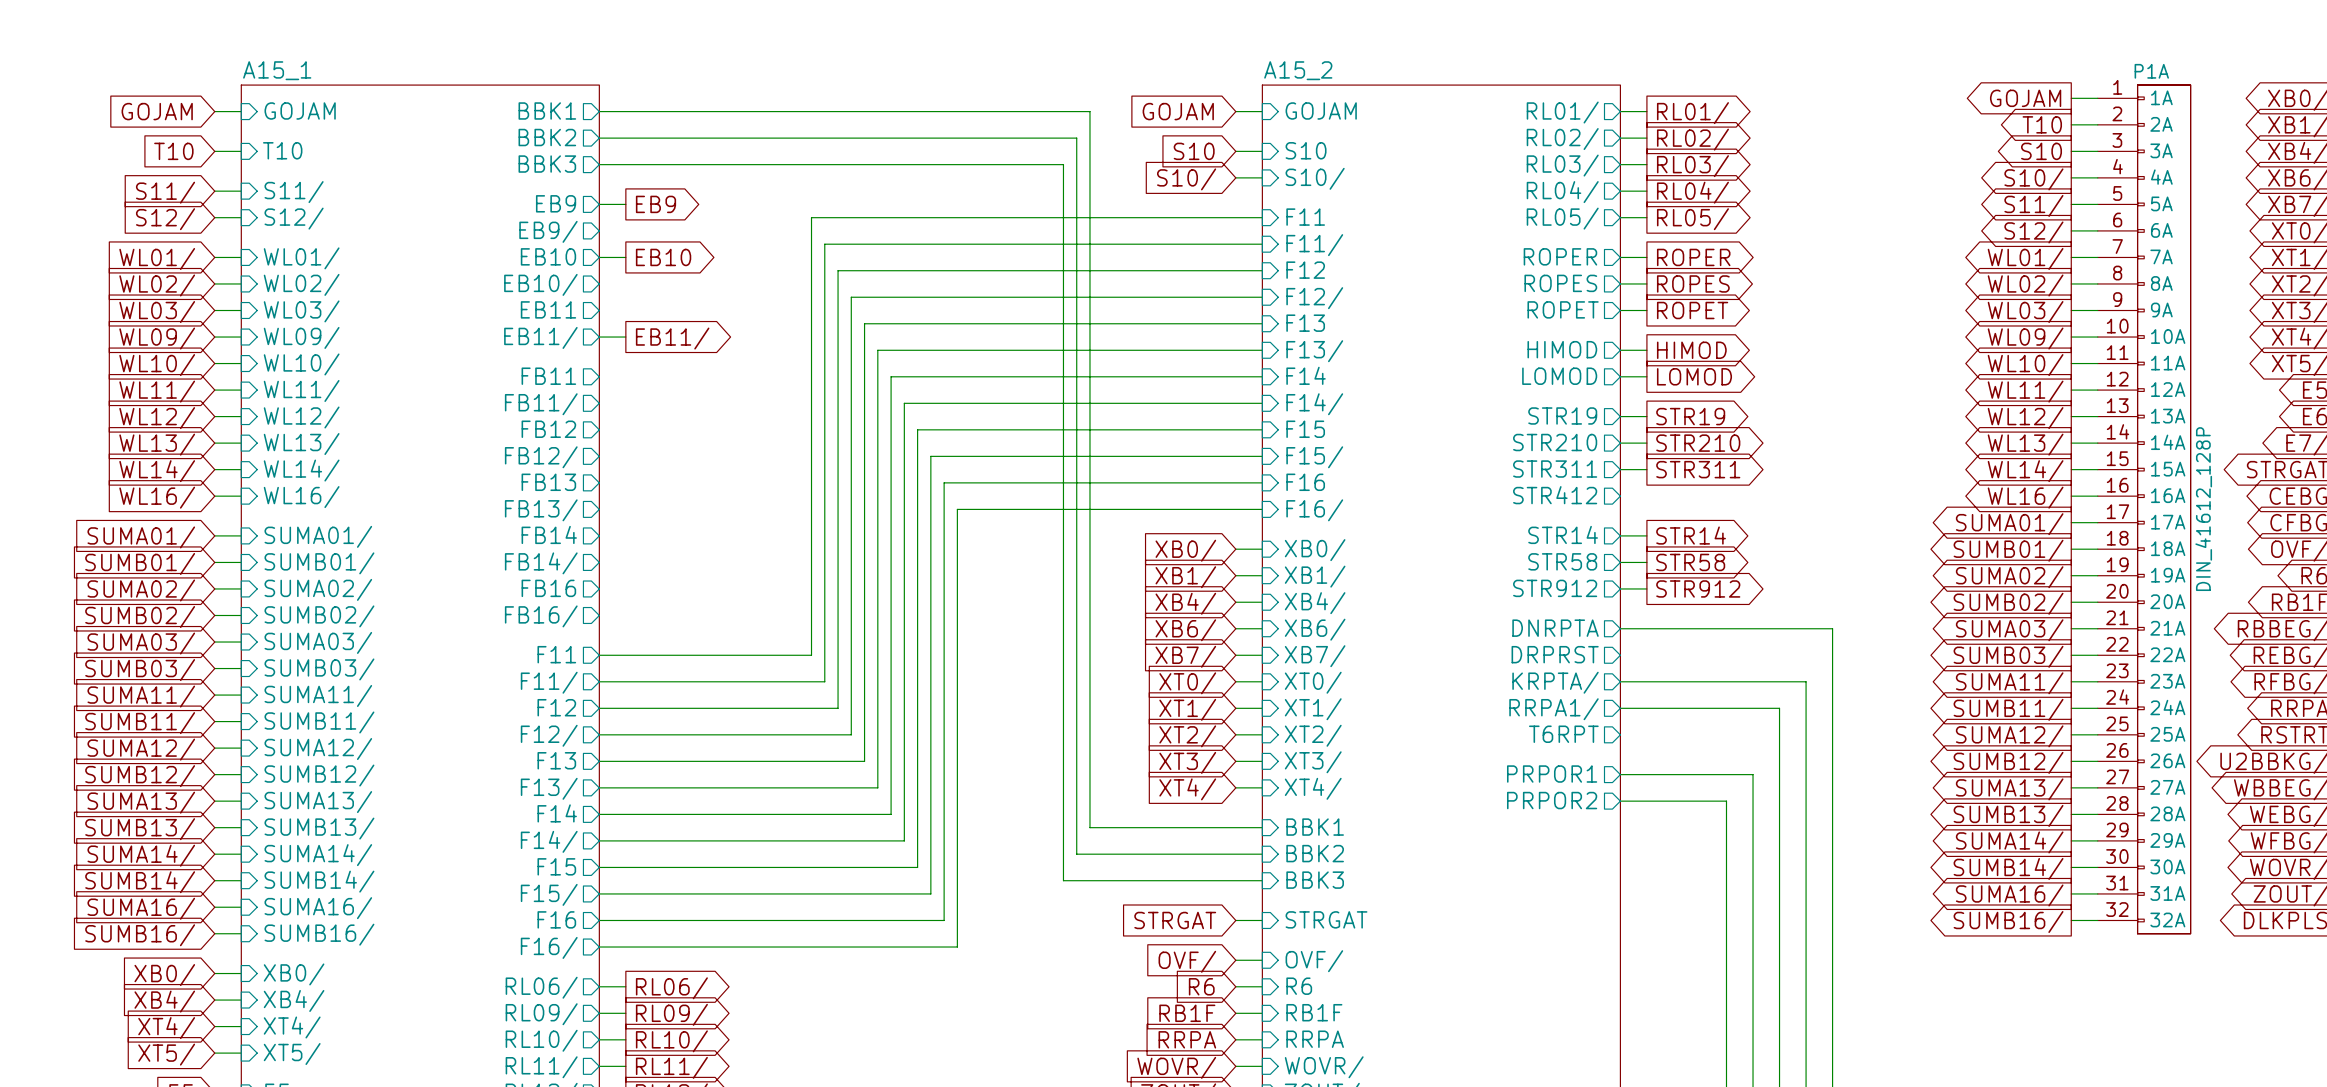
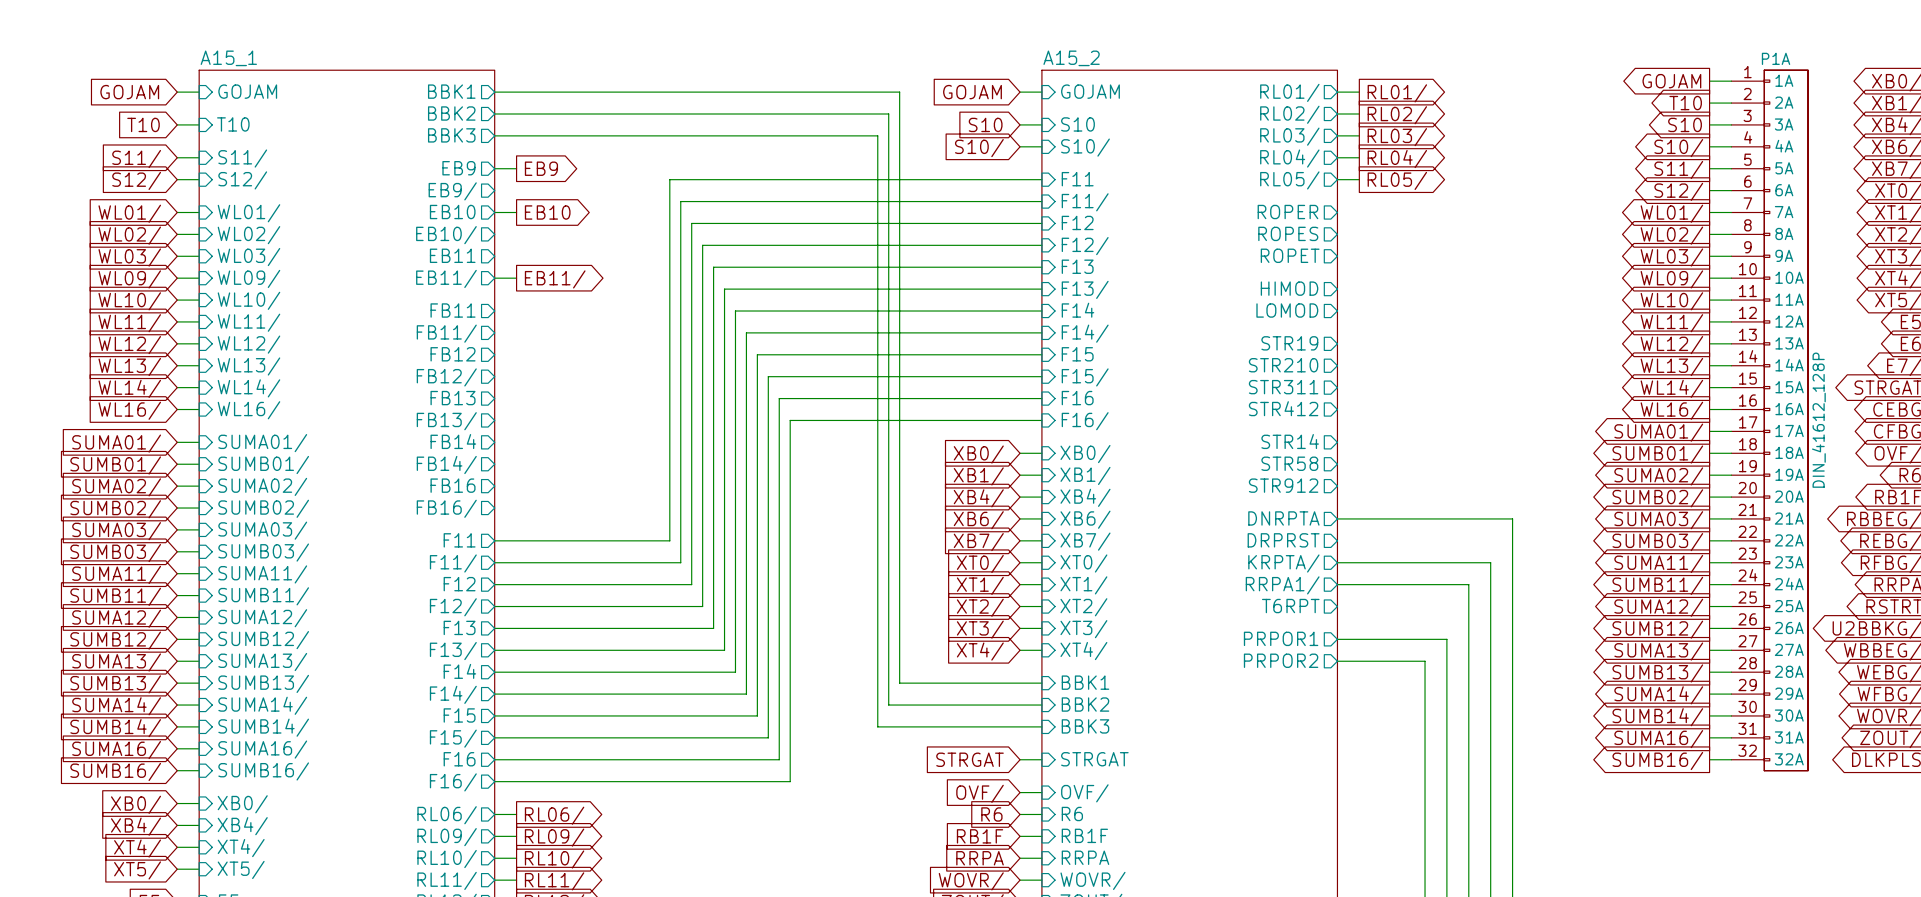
wire: (1620, 257) (1646, 257) -> none
global label: ROPER (1693, 257) -> none
wire: (1620, 283) (1646, 283) -> none
global label: ROPES (1693, 283) -> none
wire: (1620, 310) (1646, 310) -> none
global label: ROPET (1692, 310) -> none
wire: (1620, 350) (1646, 350) -> none
global label: HIMOD (1691, 350) -> none
wire: (1620, 376) (1646, 376) -> none
global label: LOMOD (1694, 376) -> none
wire: (1620, 416) (1646, 416) -> none
global label: STR19 (1690, 416) -> none
wire: (1620, 443) (1646, 443) -> none
global label: STR210 (1698, 443) -> none
wire: (1620, 469) (1646, 469) -> none
global label: STR311 (1698, 469) -> none
wire: (1620, 535) (1646, 535) -> none
global label: STR14 (1691, 535) -> none
wire: (1620, 562) (1646, 562) -> none
global label: STR58 (1690, 562) -> none
wire: (1620, 588) (1646, 588) -> none
global label: STR912 (1698, 588) -> none

